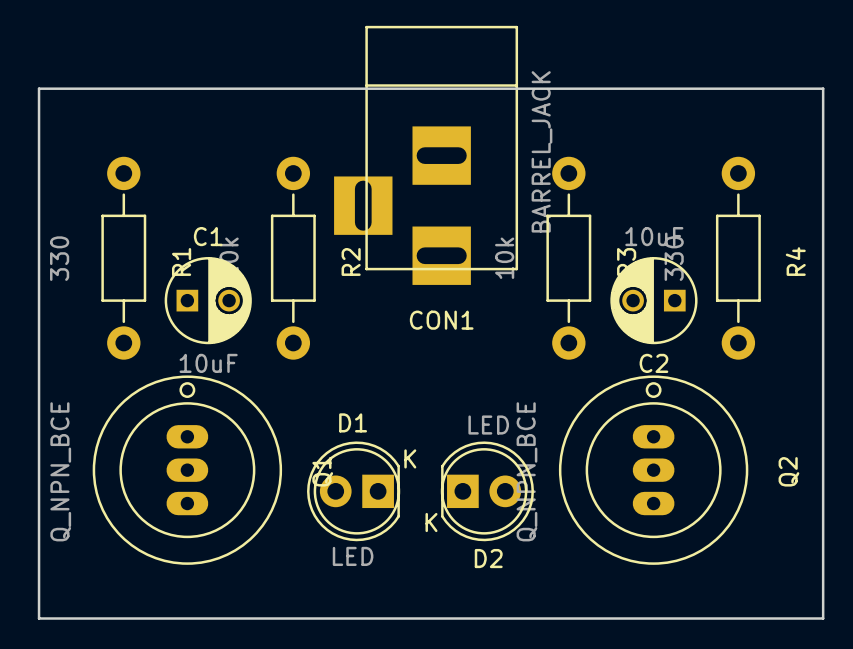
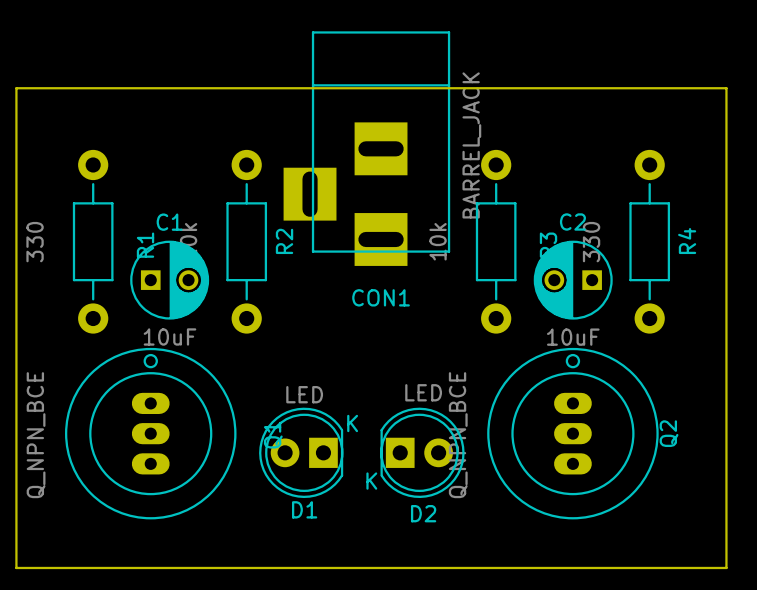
C2 value position: 10uF (654, 236) -> 10uF (573, 337)
R2 name position: R2 (351, 261) -> R2 (284, 241)
R4 name position: R4 (795, 261) -> R4 (687, 241)
C2 name position: C2 (653, 363) -> C2 (572, 221)
D1 name position: D1 (353, 422) -> D1 (304, 509)
Q2 name position: Q2 (788, 471) -> Q2 (669, 433)
D1 value position: LED (353, 556) -> LED (304, 394)

